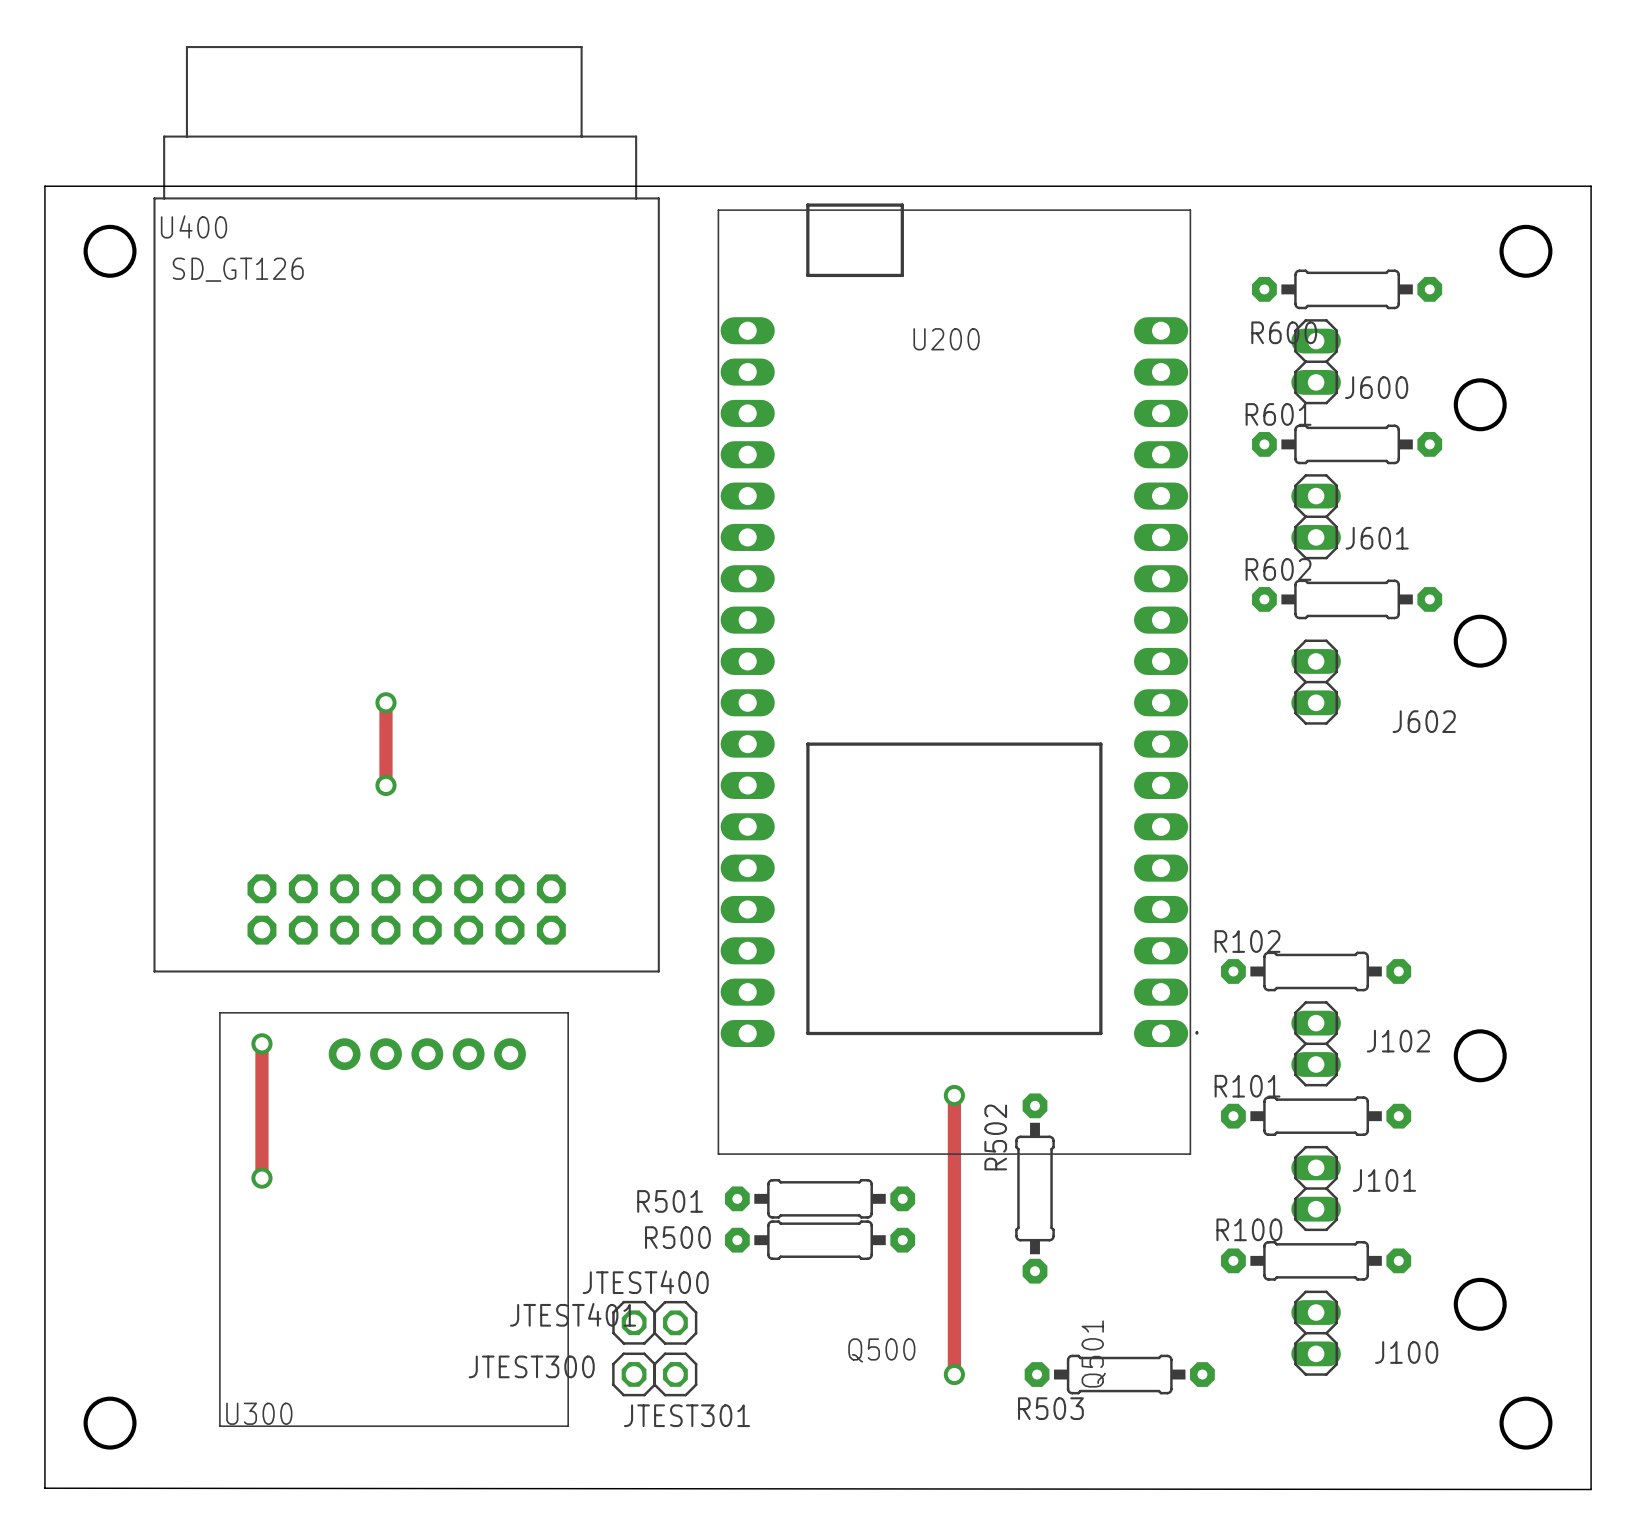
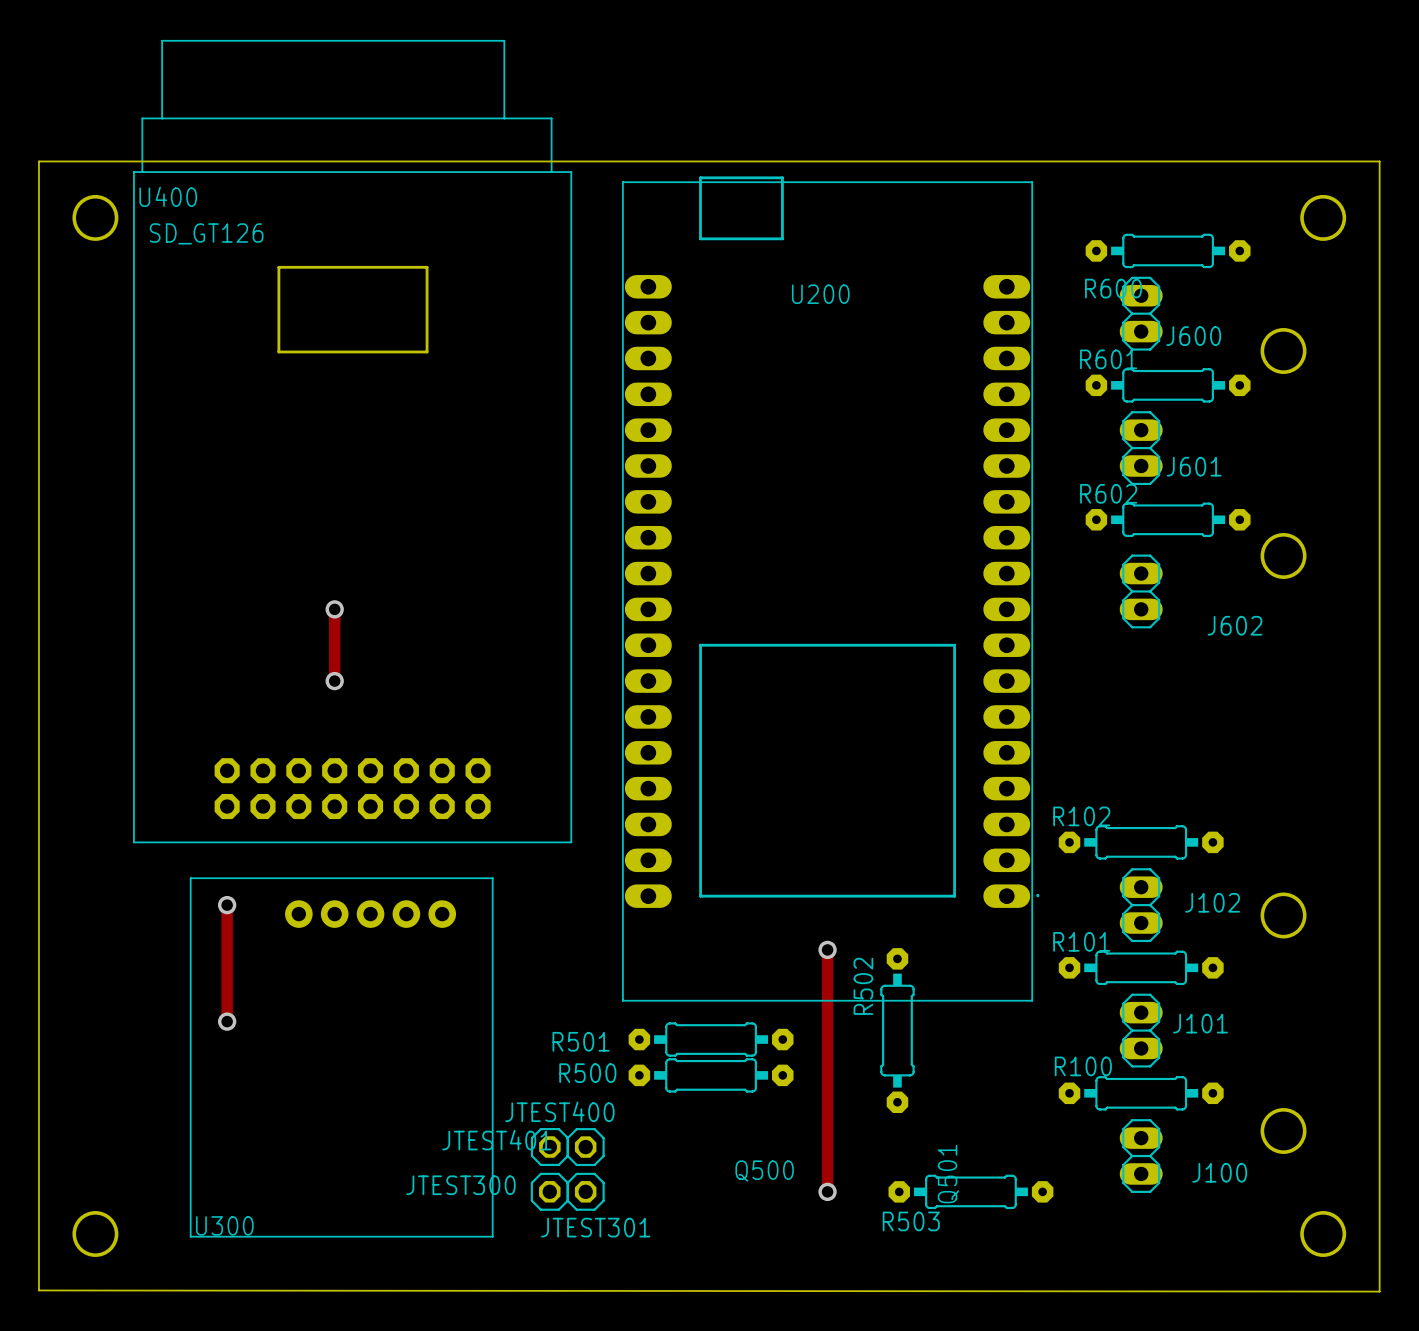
board edge: none -> (278, 267) (427, 267) (427, 351) (278, 351) (278, 267)

